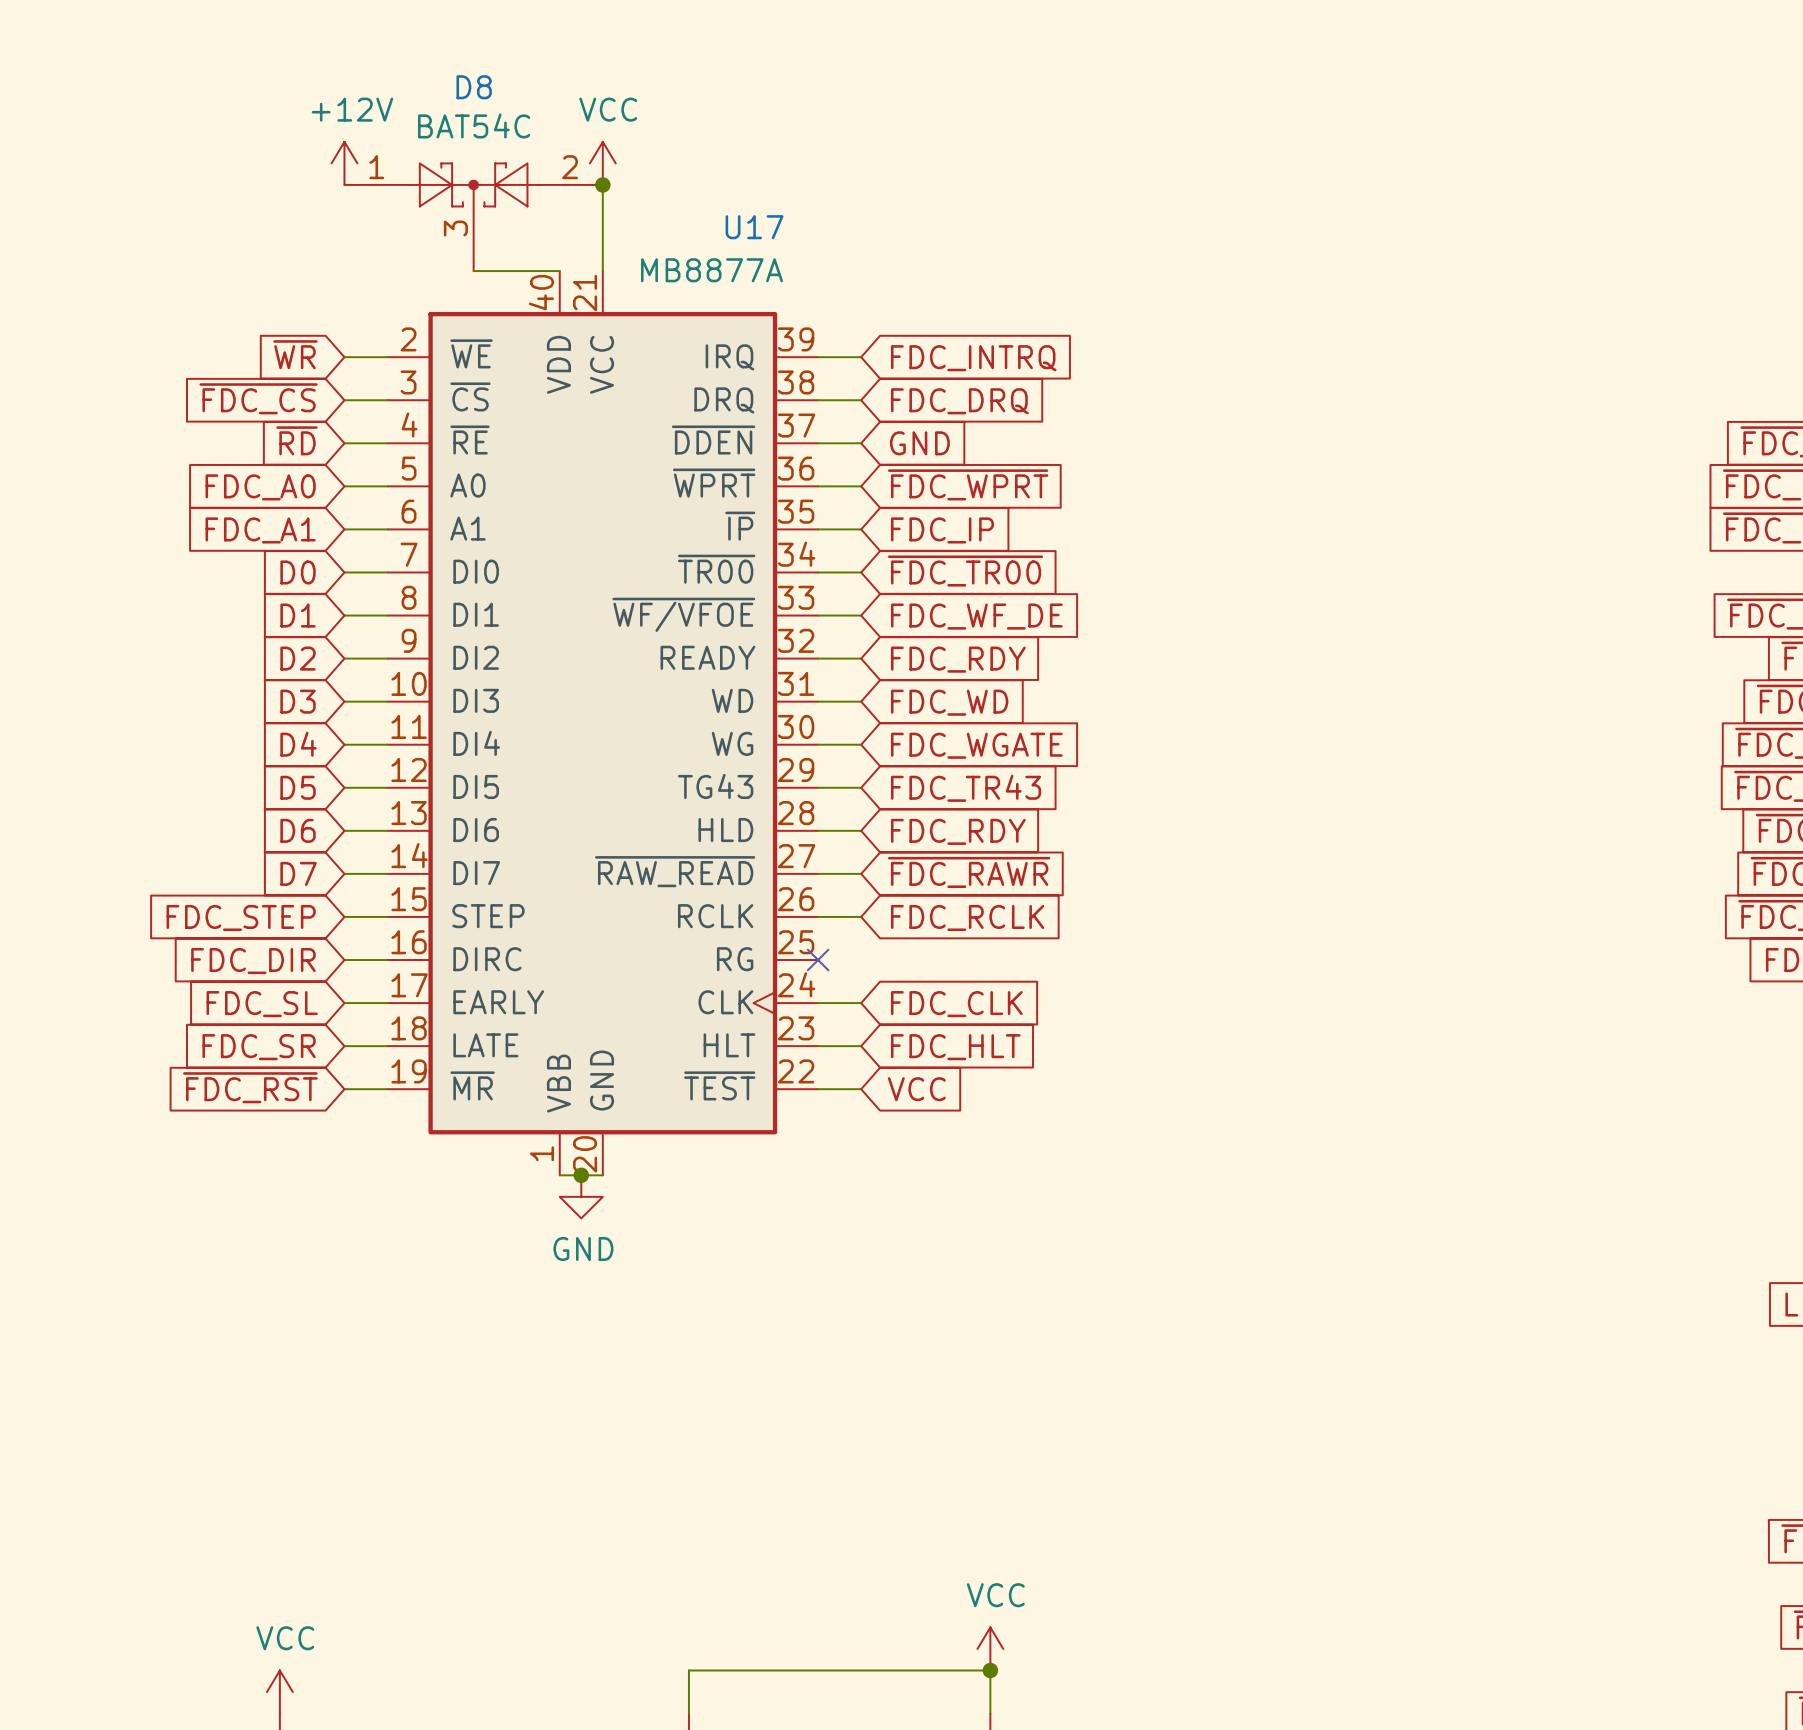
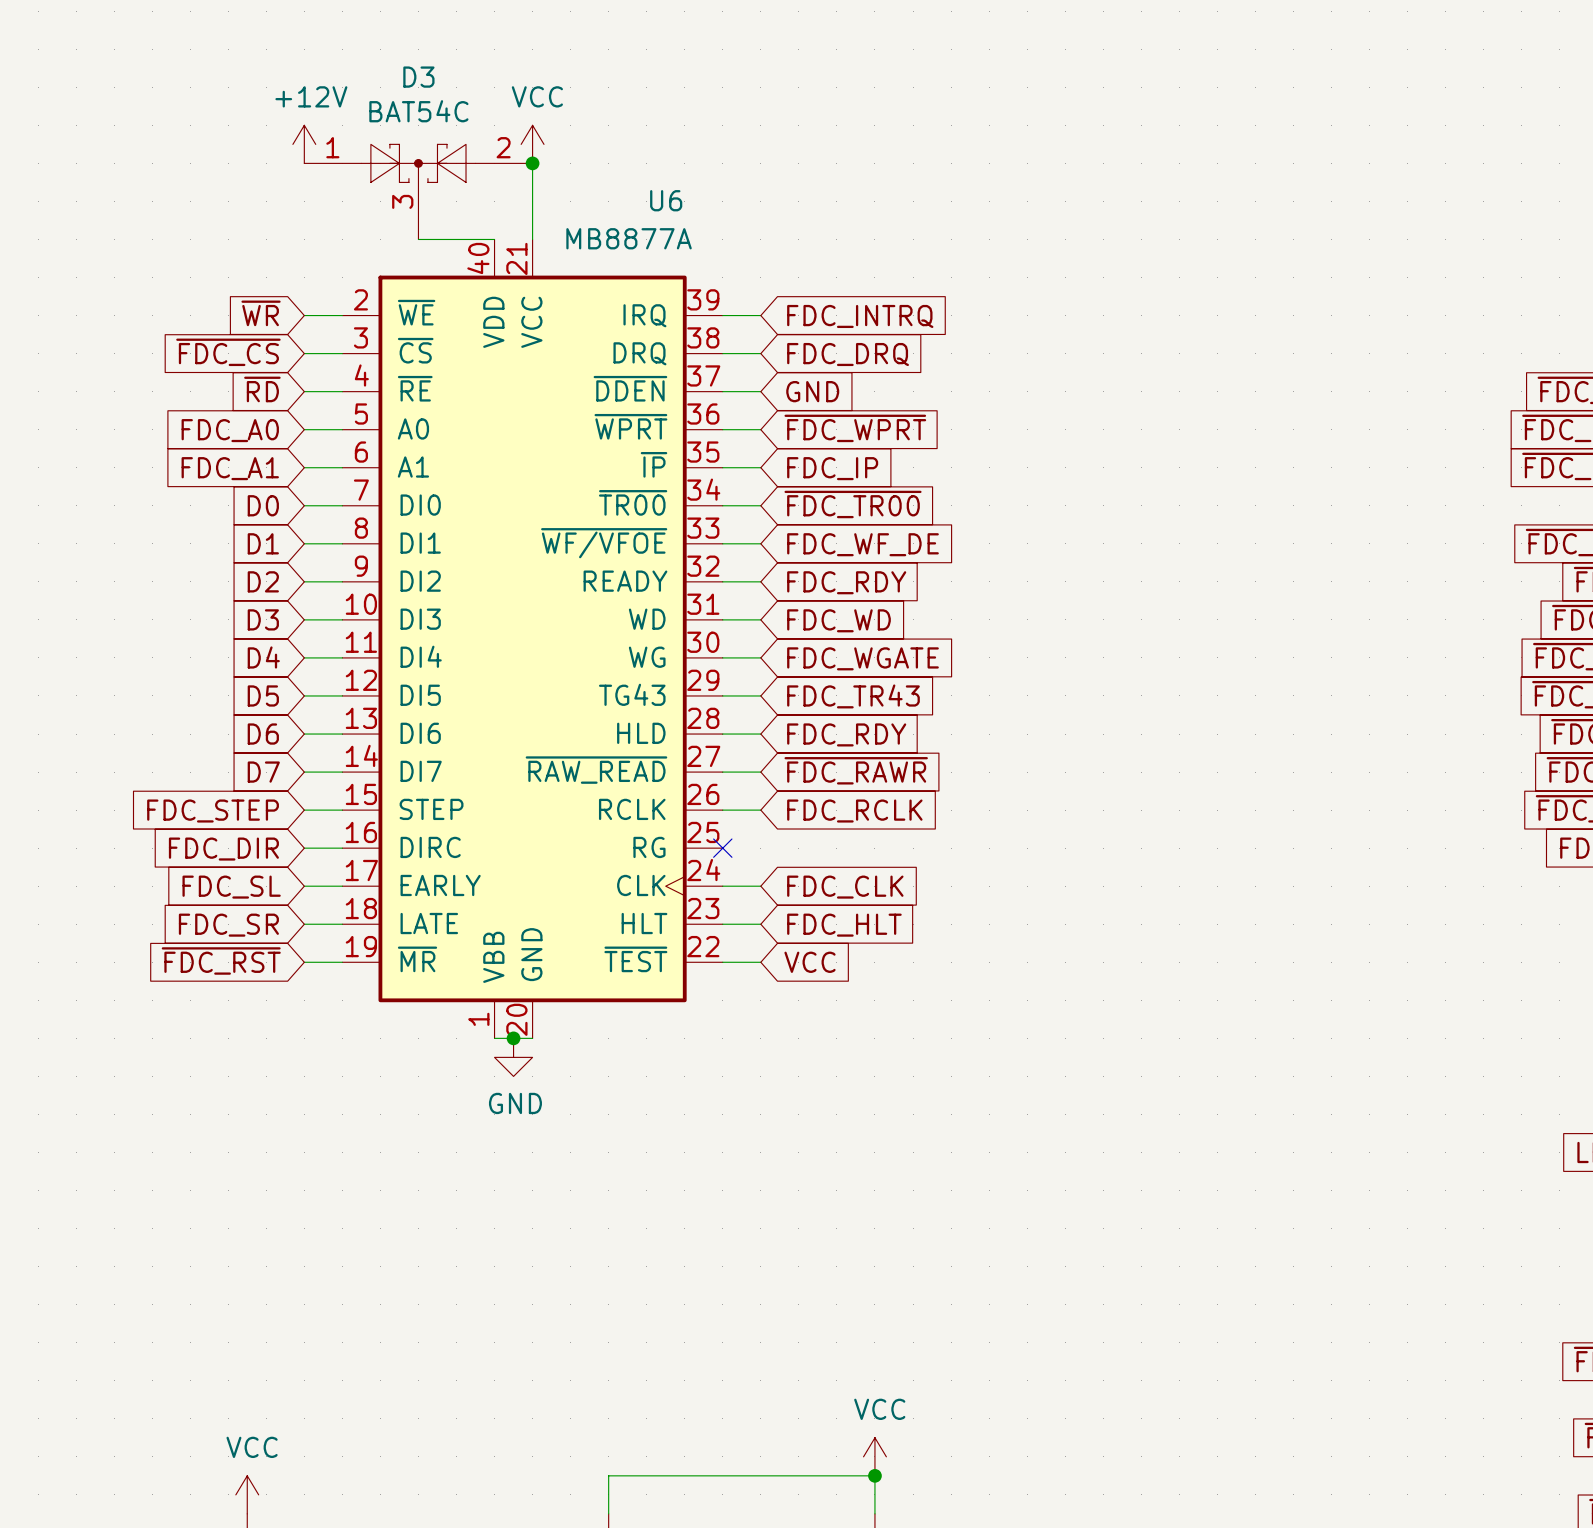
D8 name: D8 (474, 87) -> D3 (418, 77)
U17 name: U17 (754, 227) -> U6 (666, 200)

